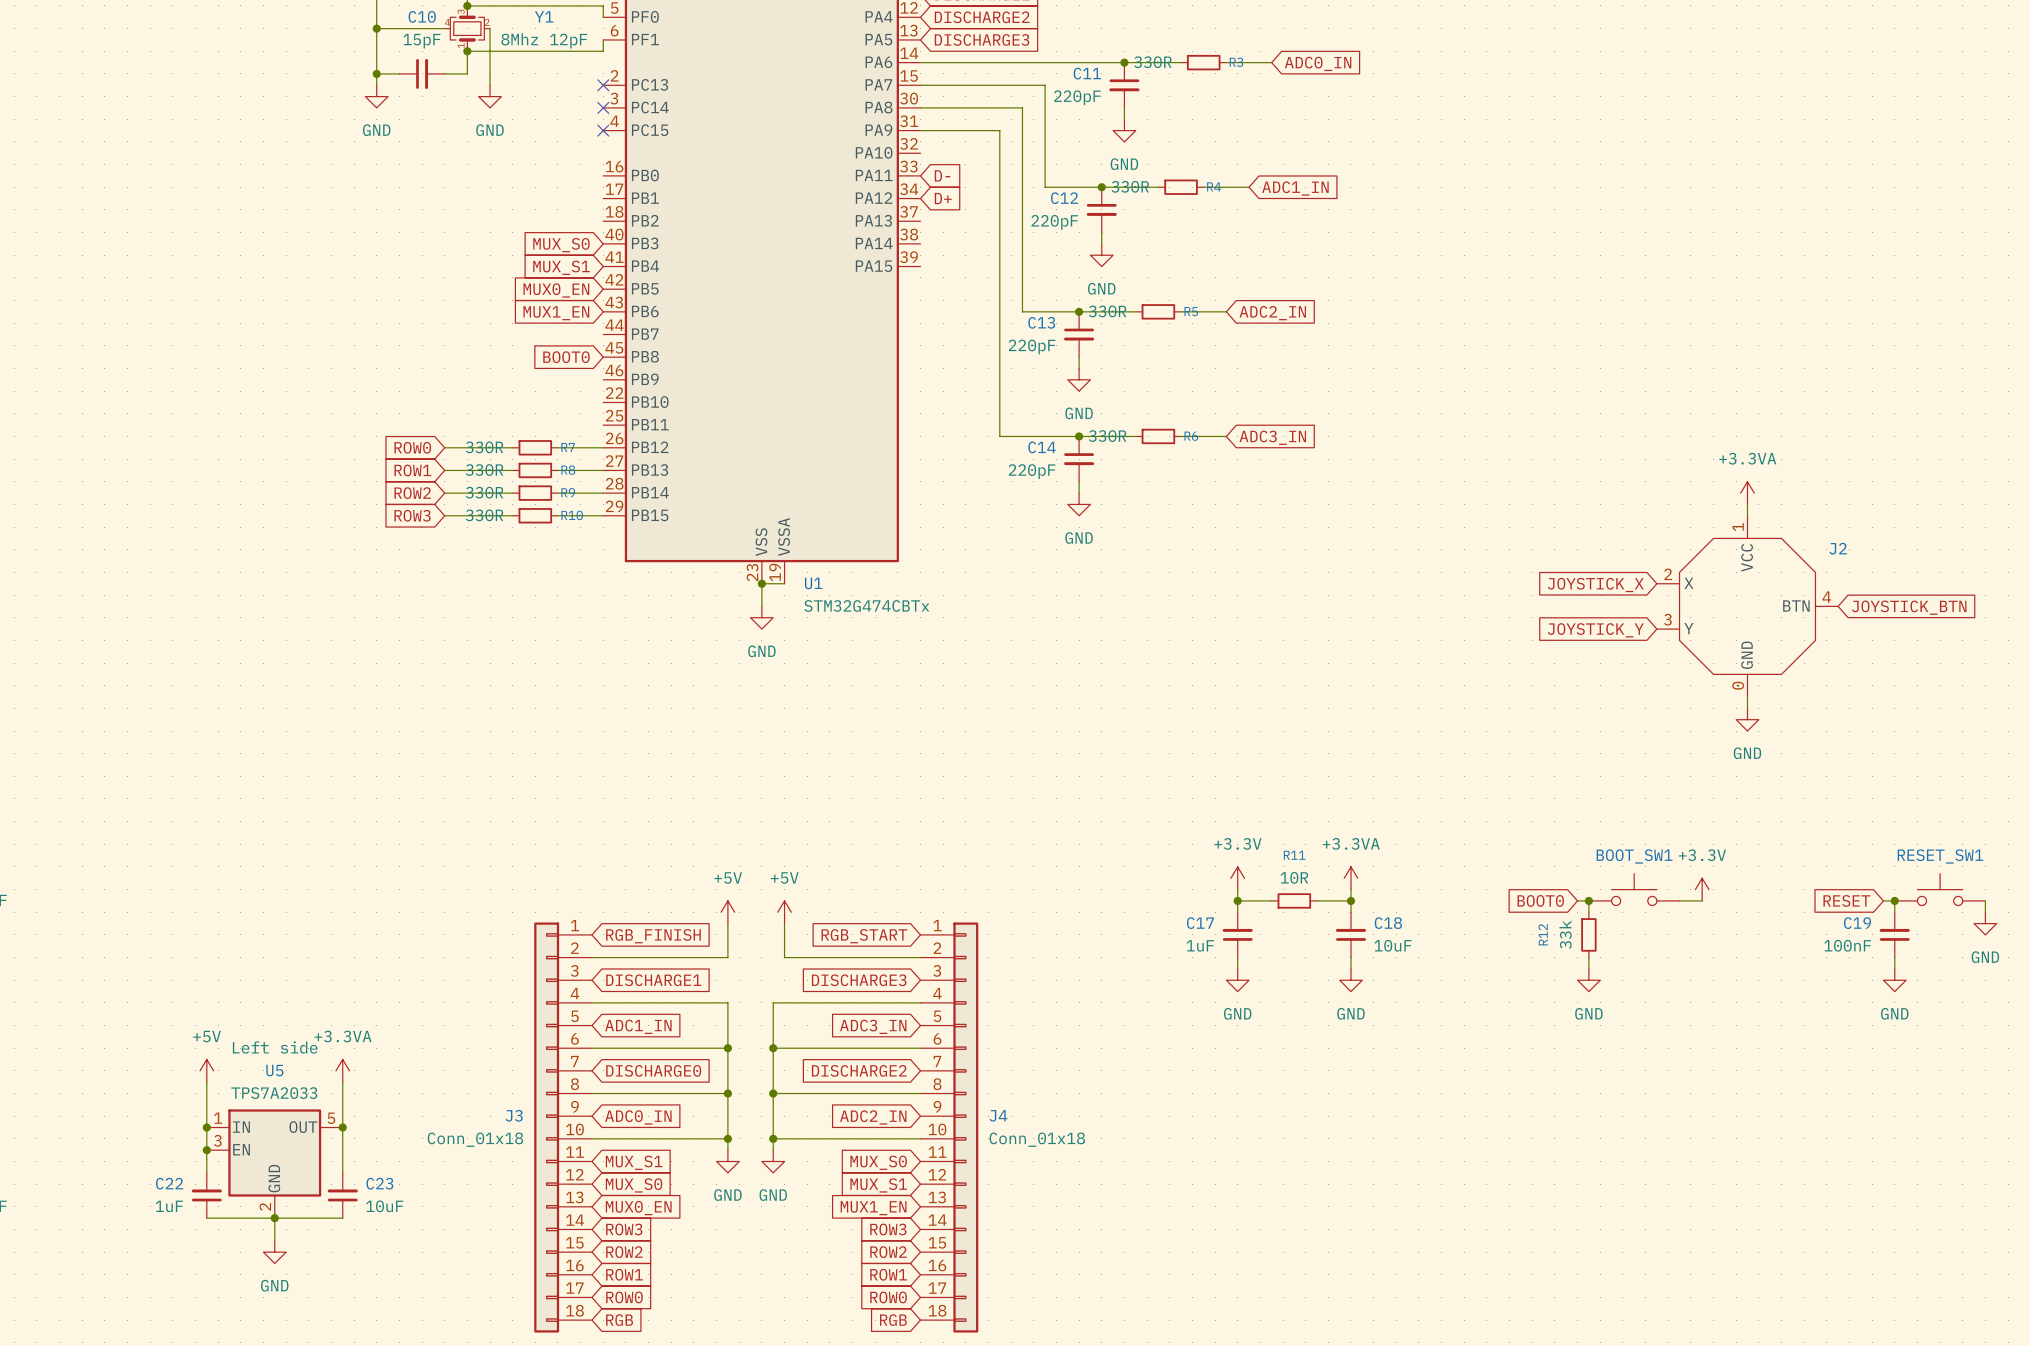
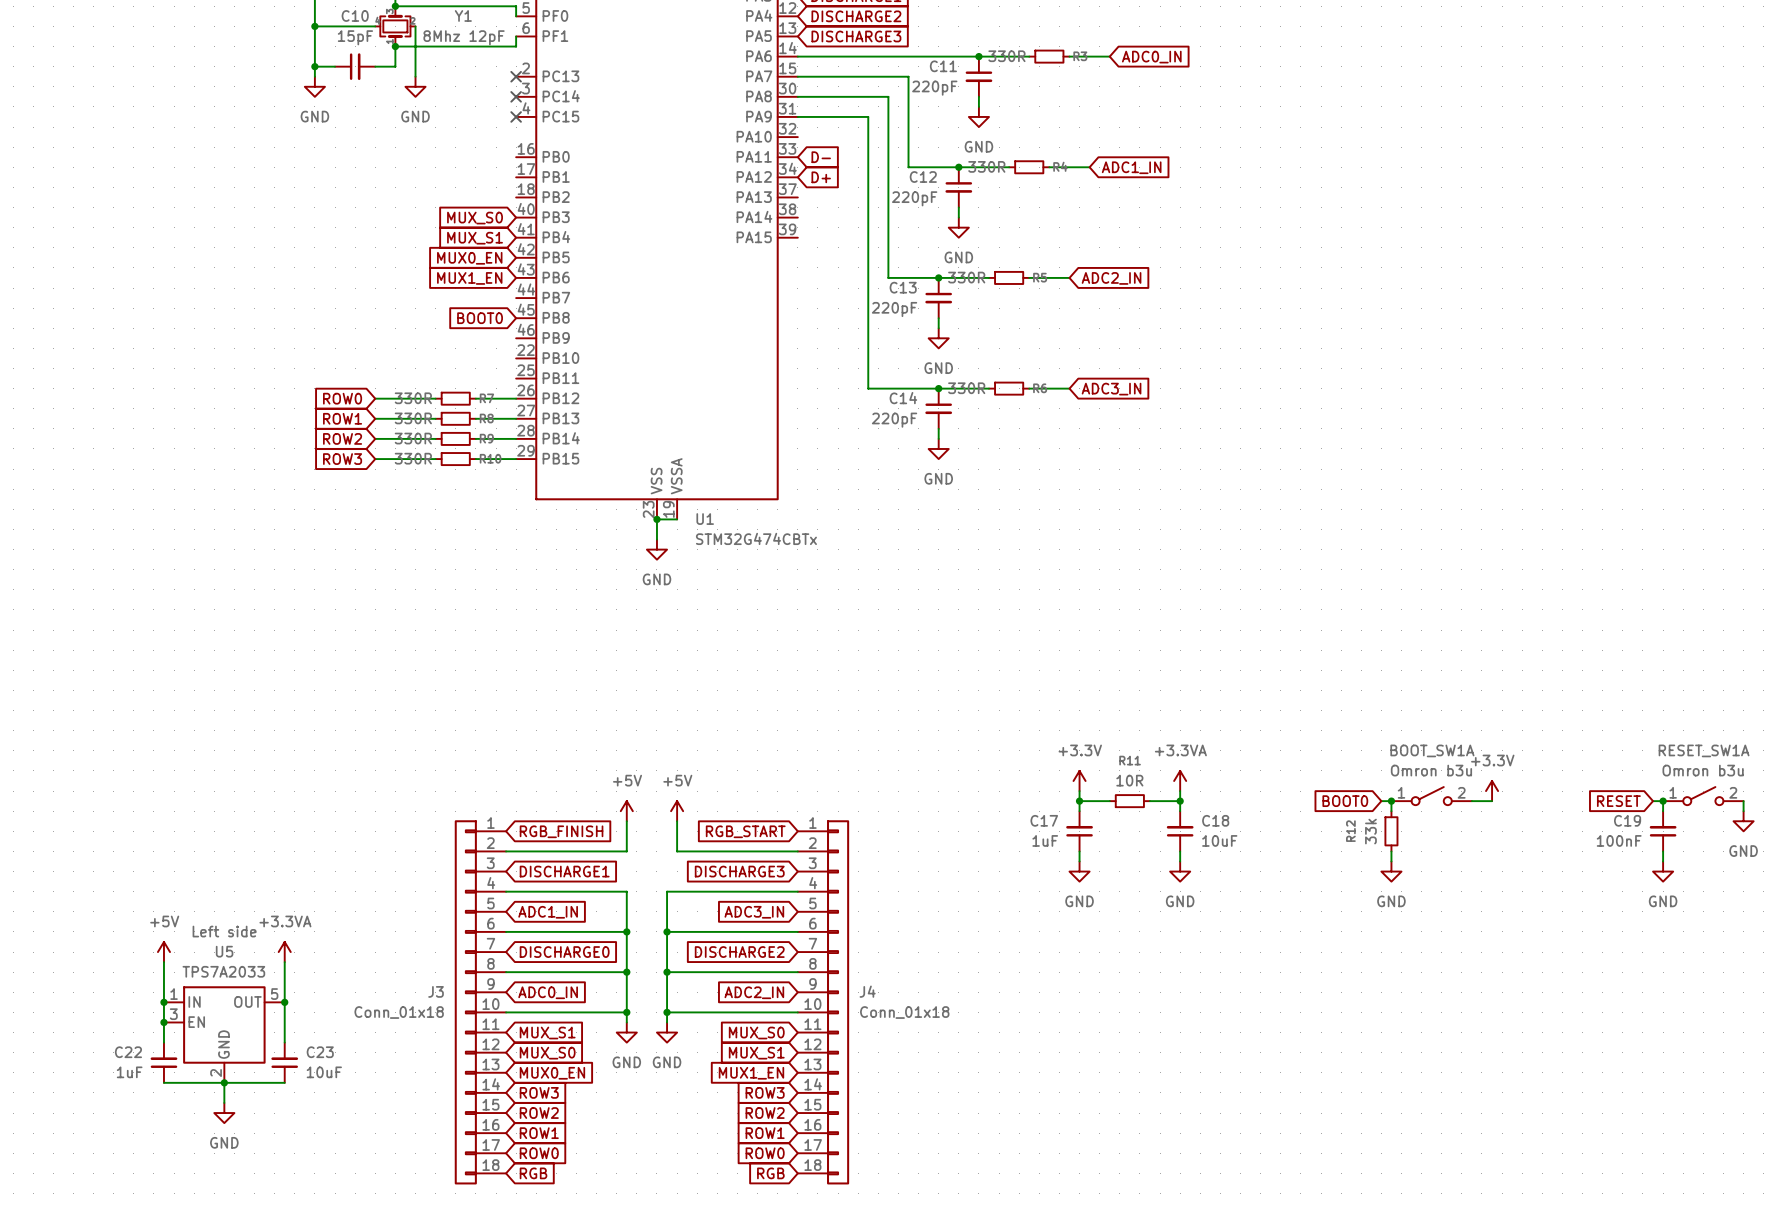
power symbol: +3.3VA (1747, 493) -> none
wire: (1747, 504) (1747, 515) -> none
global label: JOYSTICK_X (1595, 585) -> none
J2: (1747, 606) -> none
global label: JOYSTICK_BTN (1909, 607) -> none
global label: JOYSTICK_Y (1595, 630) -> none
wire: (1747, 697) (1747, 708) -> none
power symbol: GND (1747, 719) -> none
BOOT_SW1: (1634, 889) -> none
RESET_SW1: (1940, 889) -> none
BOOT_SW1A: none -> Omron b3u (1431, 796)
RESET_SW1A: none -> Omron b3u (1703, 796)

